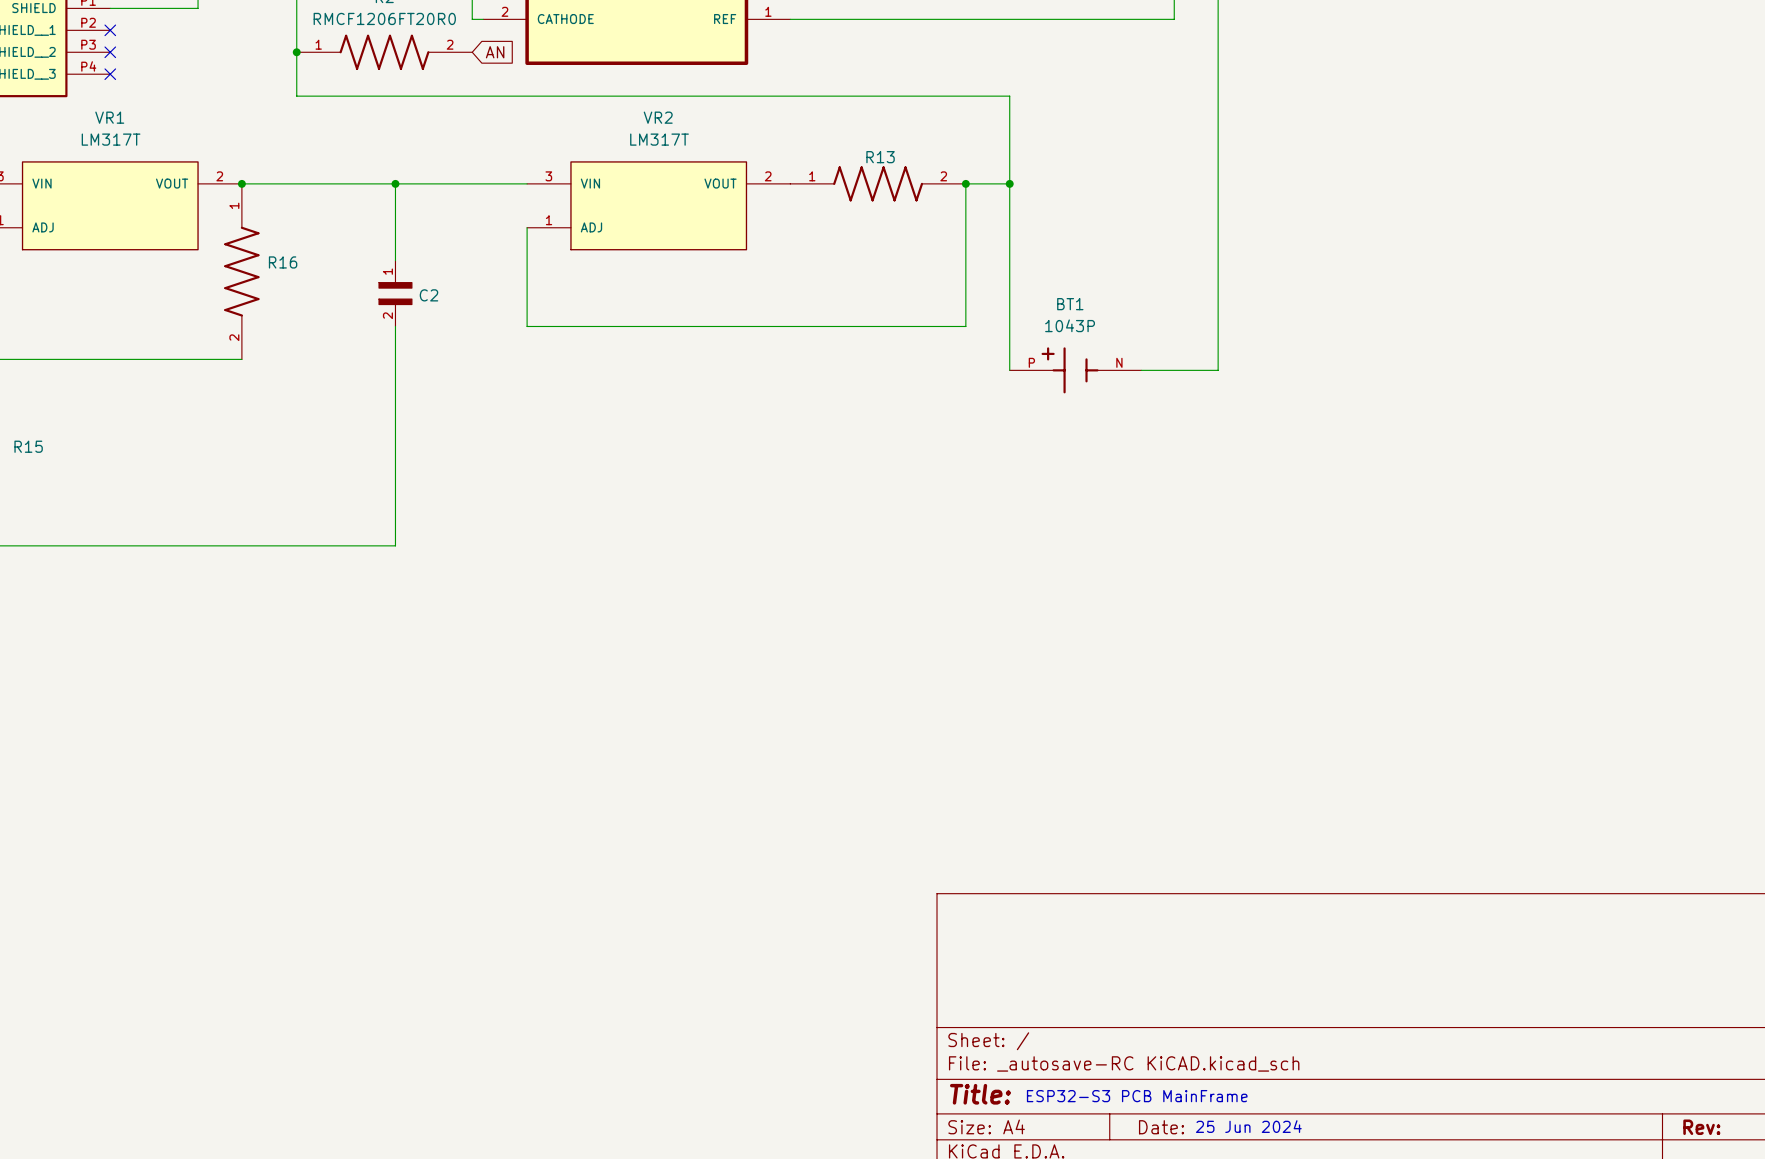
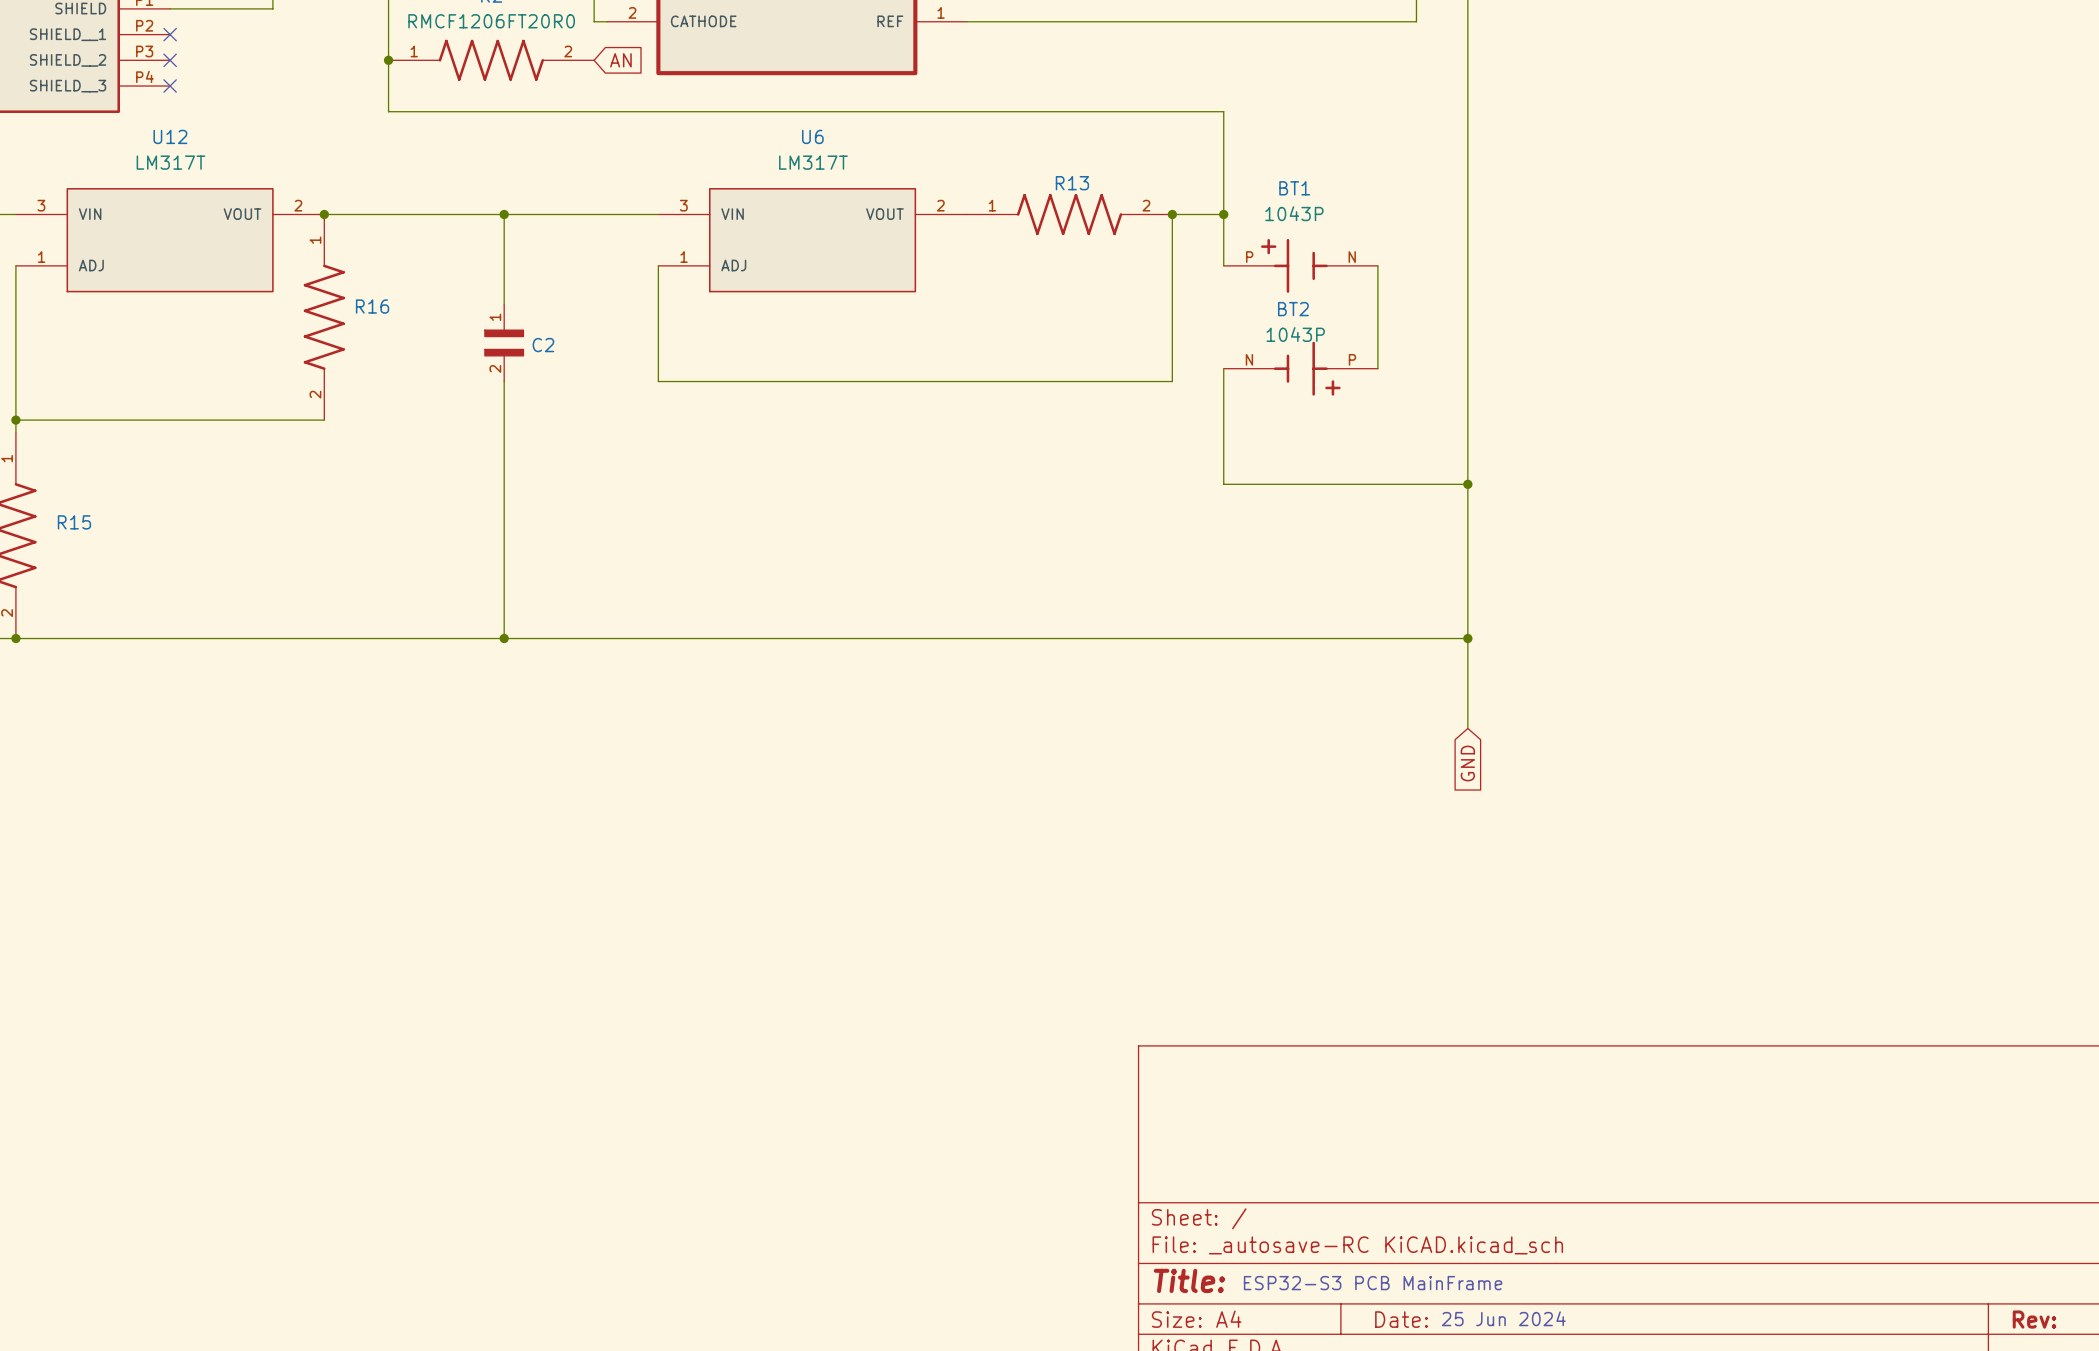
VR1 name: VR1 (109, 117) -> U12 (170, 136)
VR2 name: VR2 (658, 117) -> U6 (812, 136)
wire: (1009, 227) (1009, 315) -> (1377, 265) (1377, 368)
BT2: none -> 1043P (1300, 368)
wire: none -> (1223, 432) (1223, 484) (1467, 484)
BT1 position: (1075, 370) -> (1300, 265)
wire: (1141, 370) (1218, 370) -> (1467, 728) (1467, 432)
junction: none -> (1467, 484)
wire: none -> (504, 638) (1467, 638)
junction: none -> (504, 638)
junction: none -> (1467, 638)
global label: none -> GND (1467, 763)

